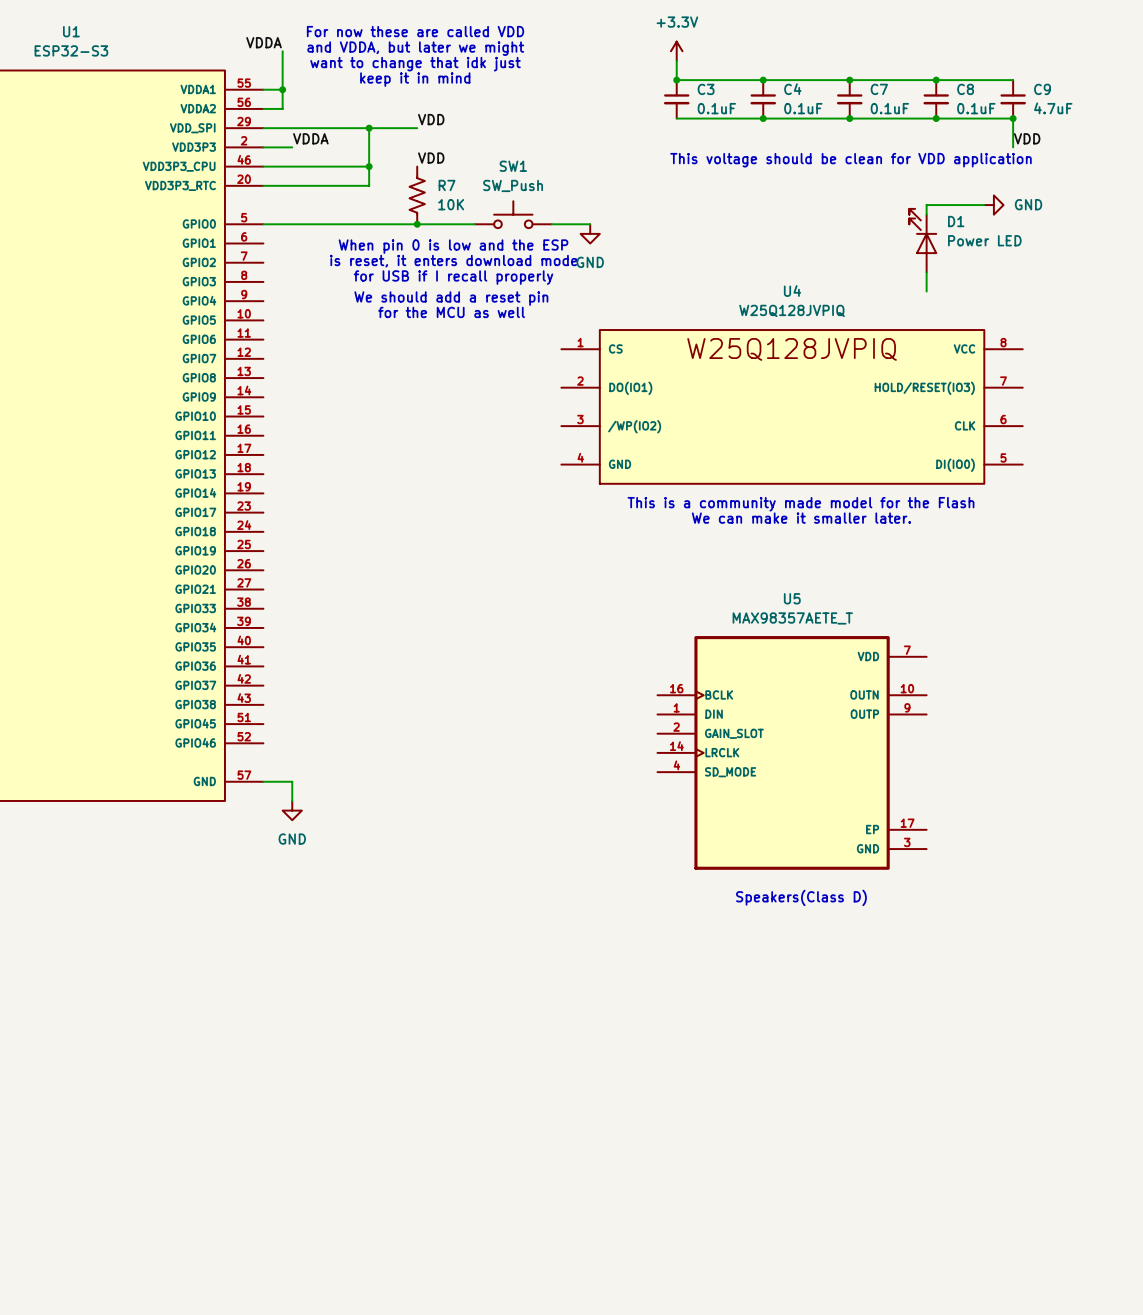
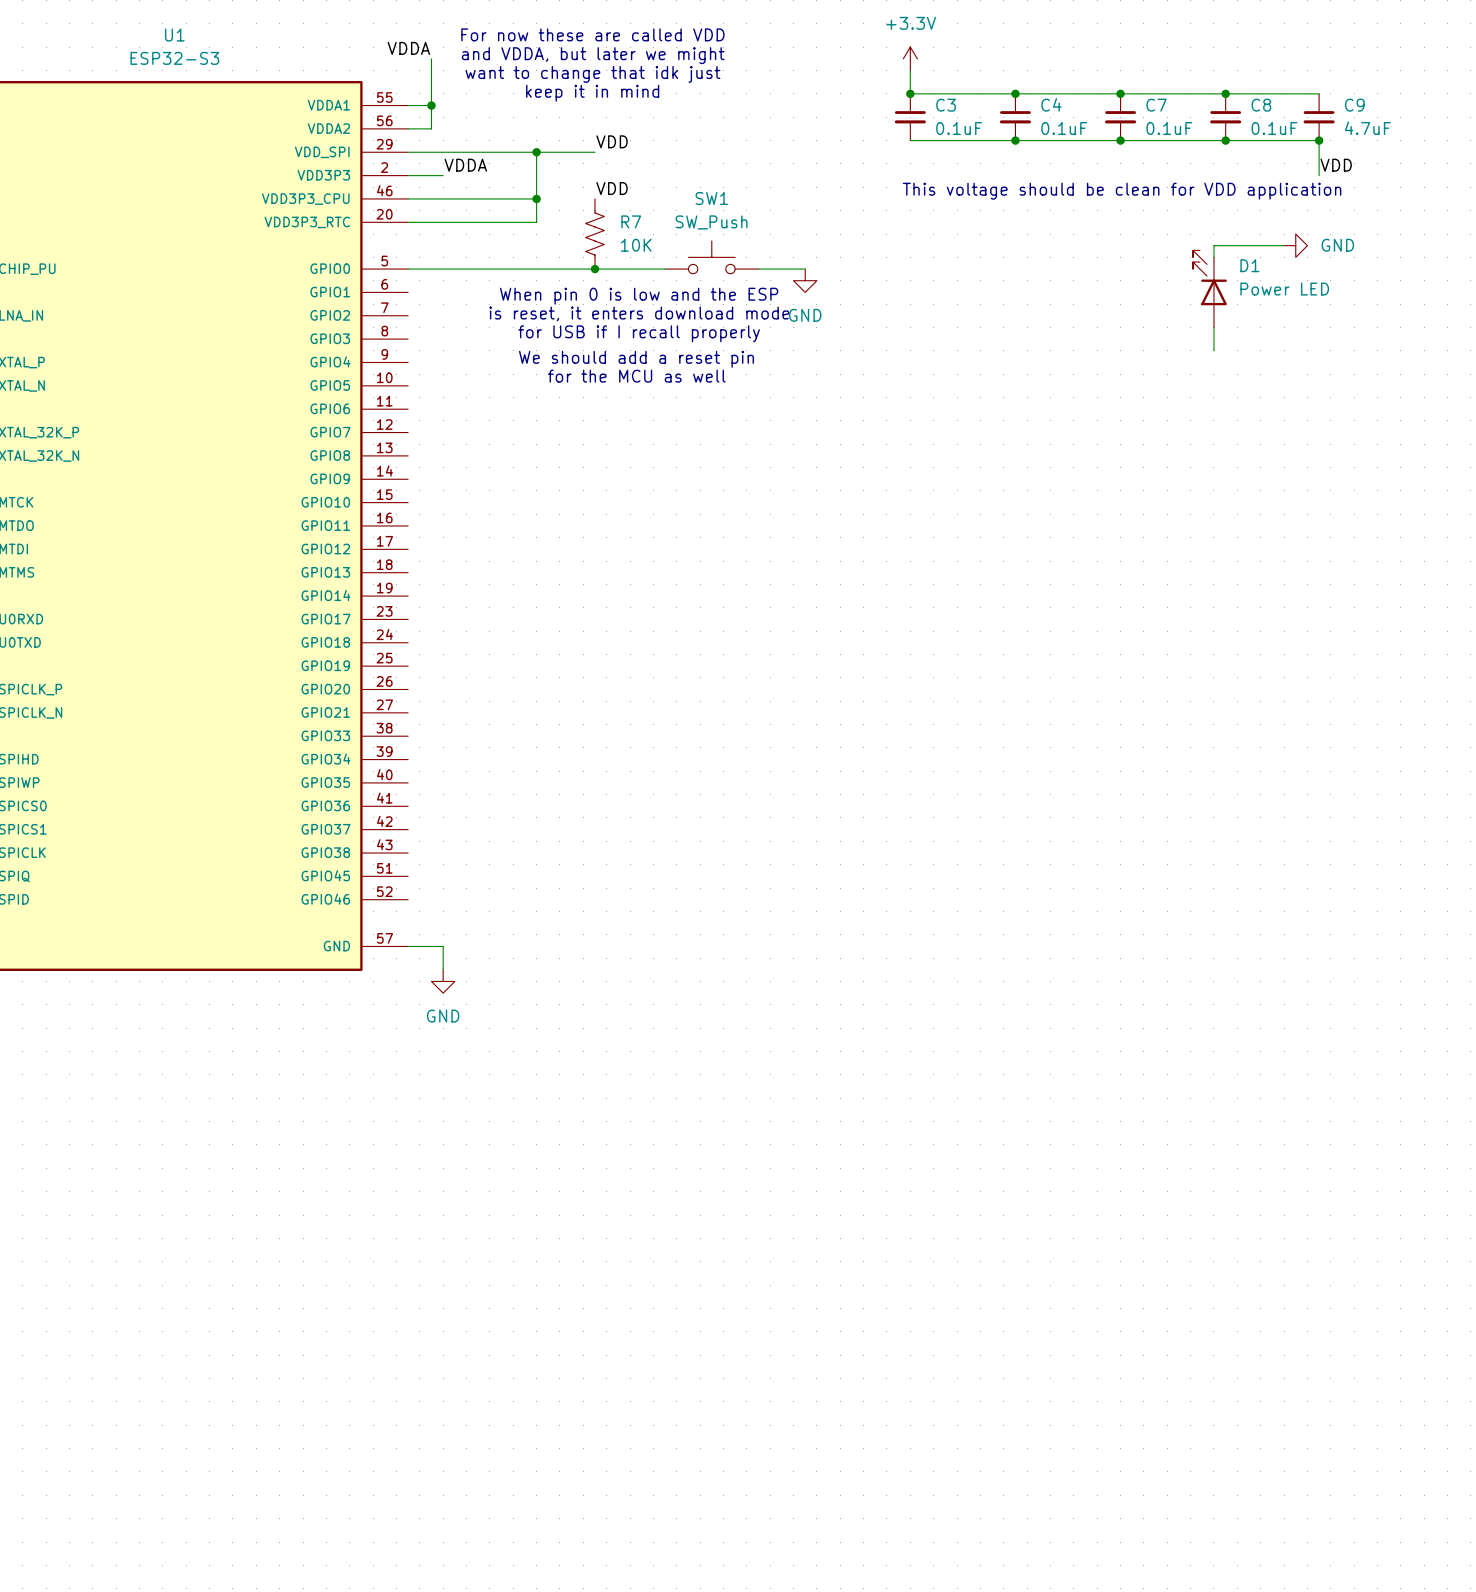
U4: W25Q128JVPIQ (792, 406) -> none
text: This is a community made model for the Flash (800, 504) -> none
text: We can make it smaller later. (801, 518) -> none
U5: MAX98357AETE_T (792, 752) -> none
text: Speakers(Class D) (801, 897) -> none

